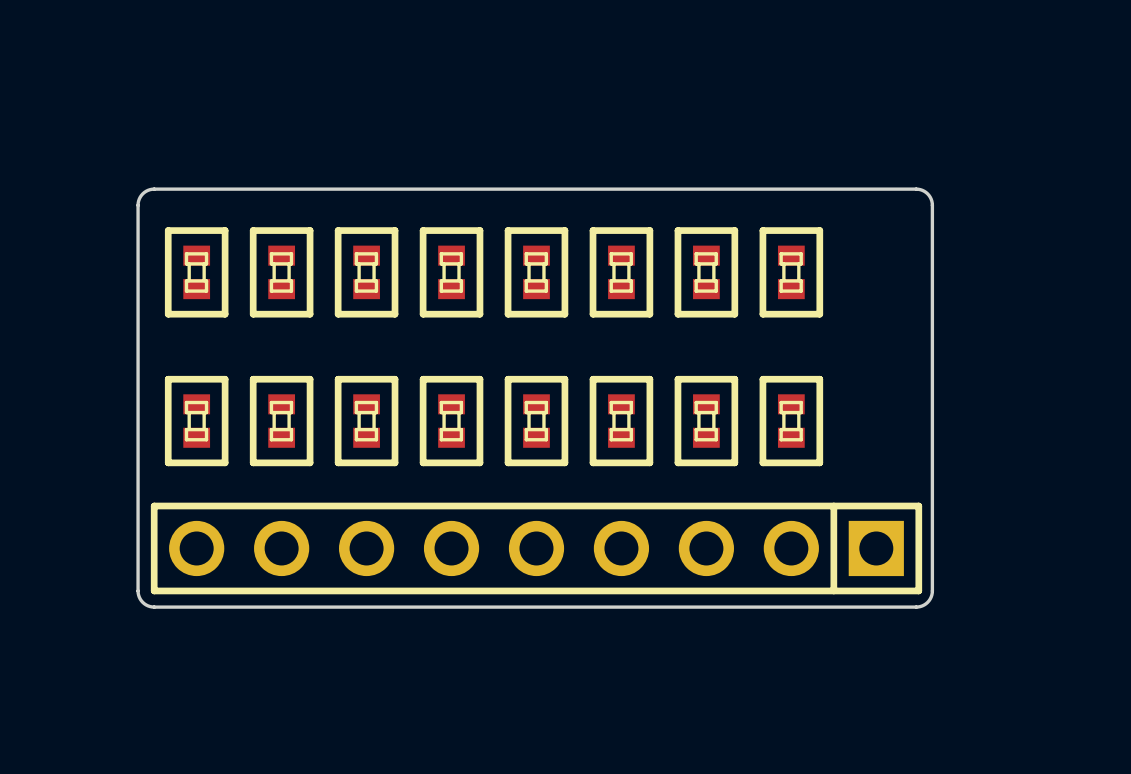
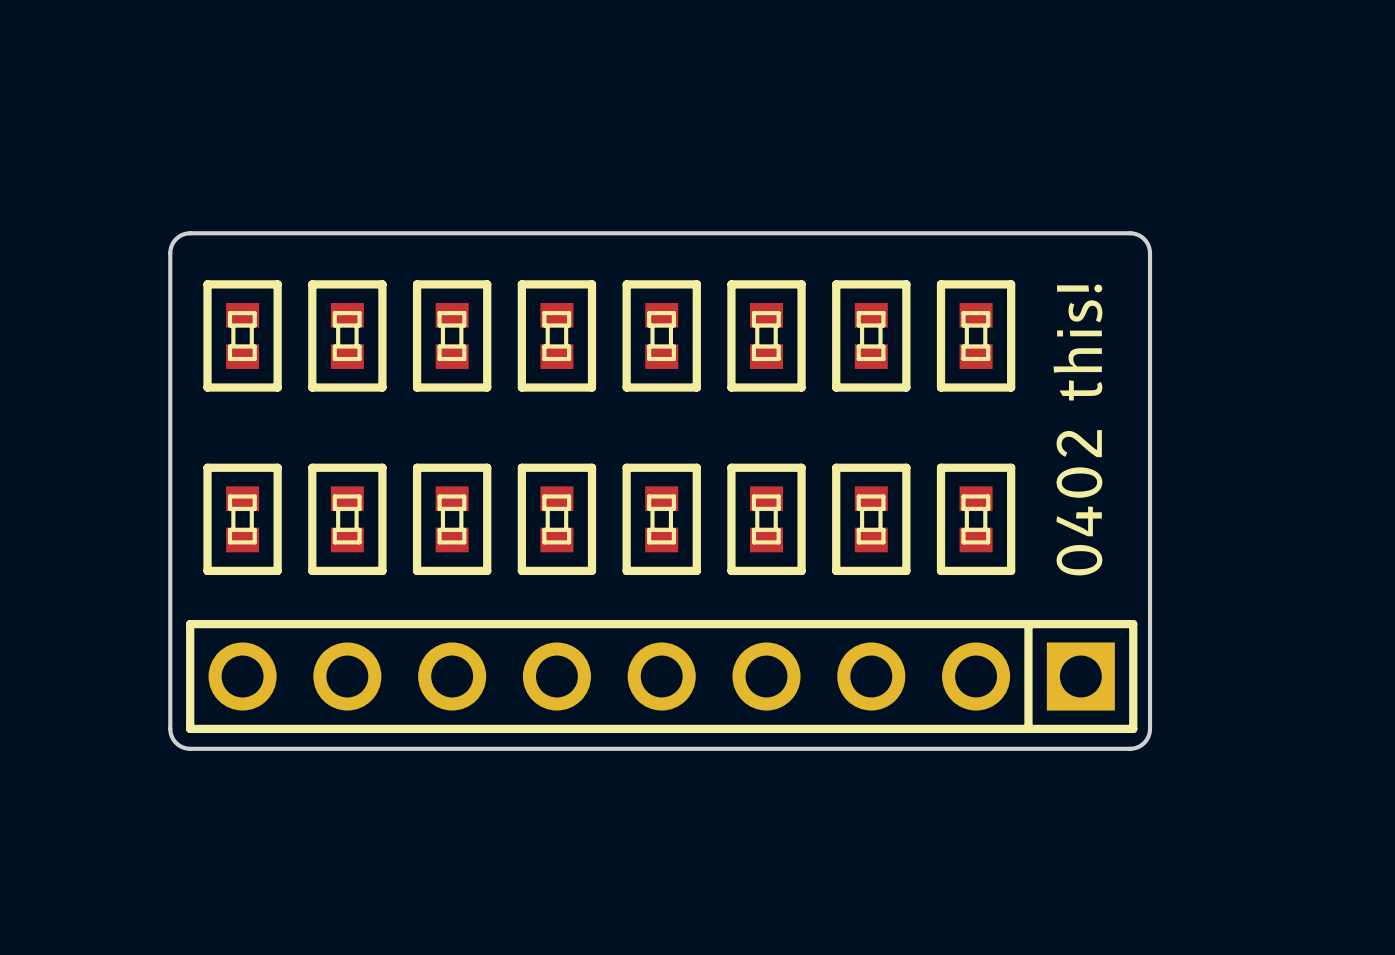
text: none -> 0402 this! (1077, 429)

